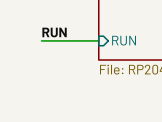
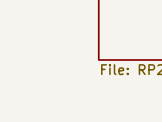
label: RUN (54, 32) -> none
wire: (41, 40) (98, 40) -> none
sheet pin: RUN (124, 40) -> none

